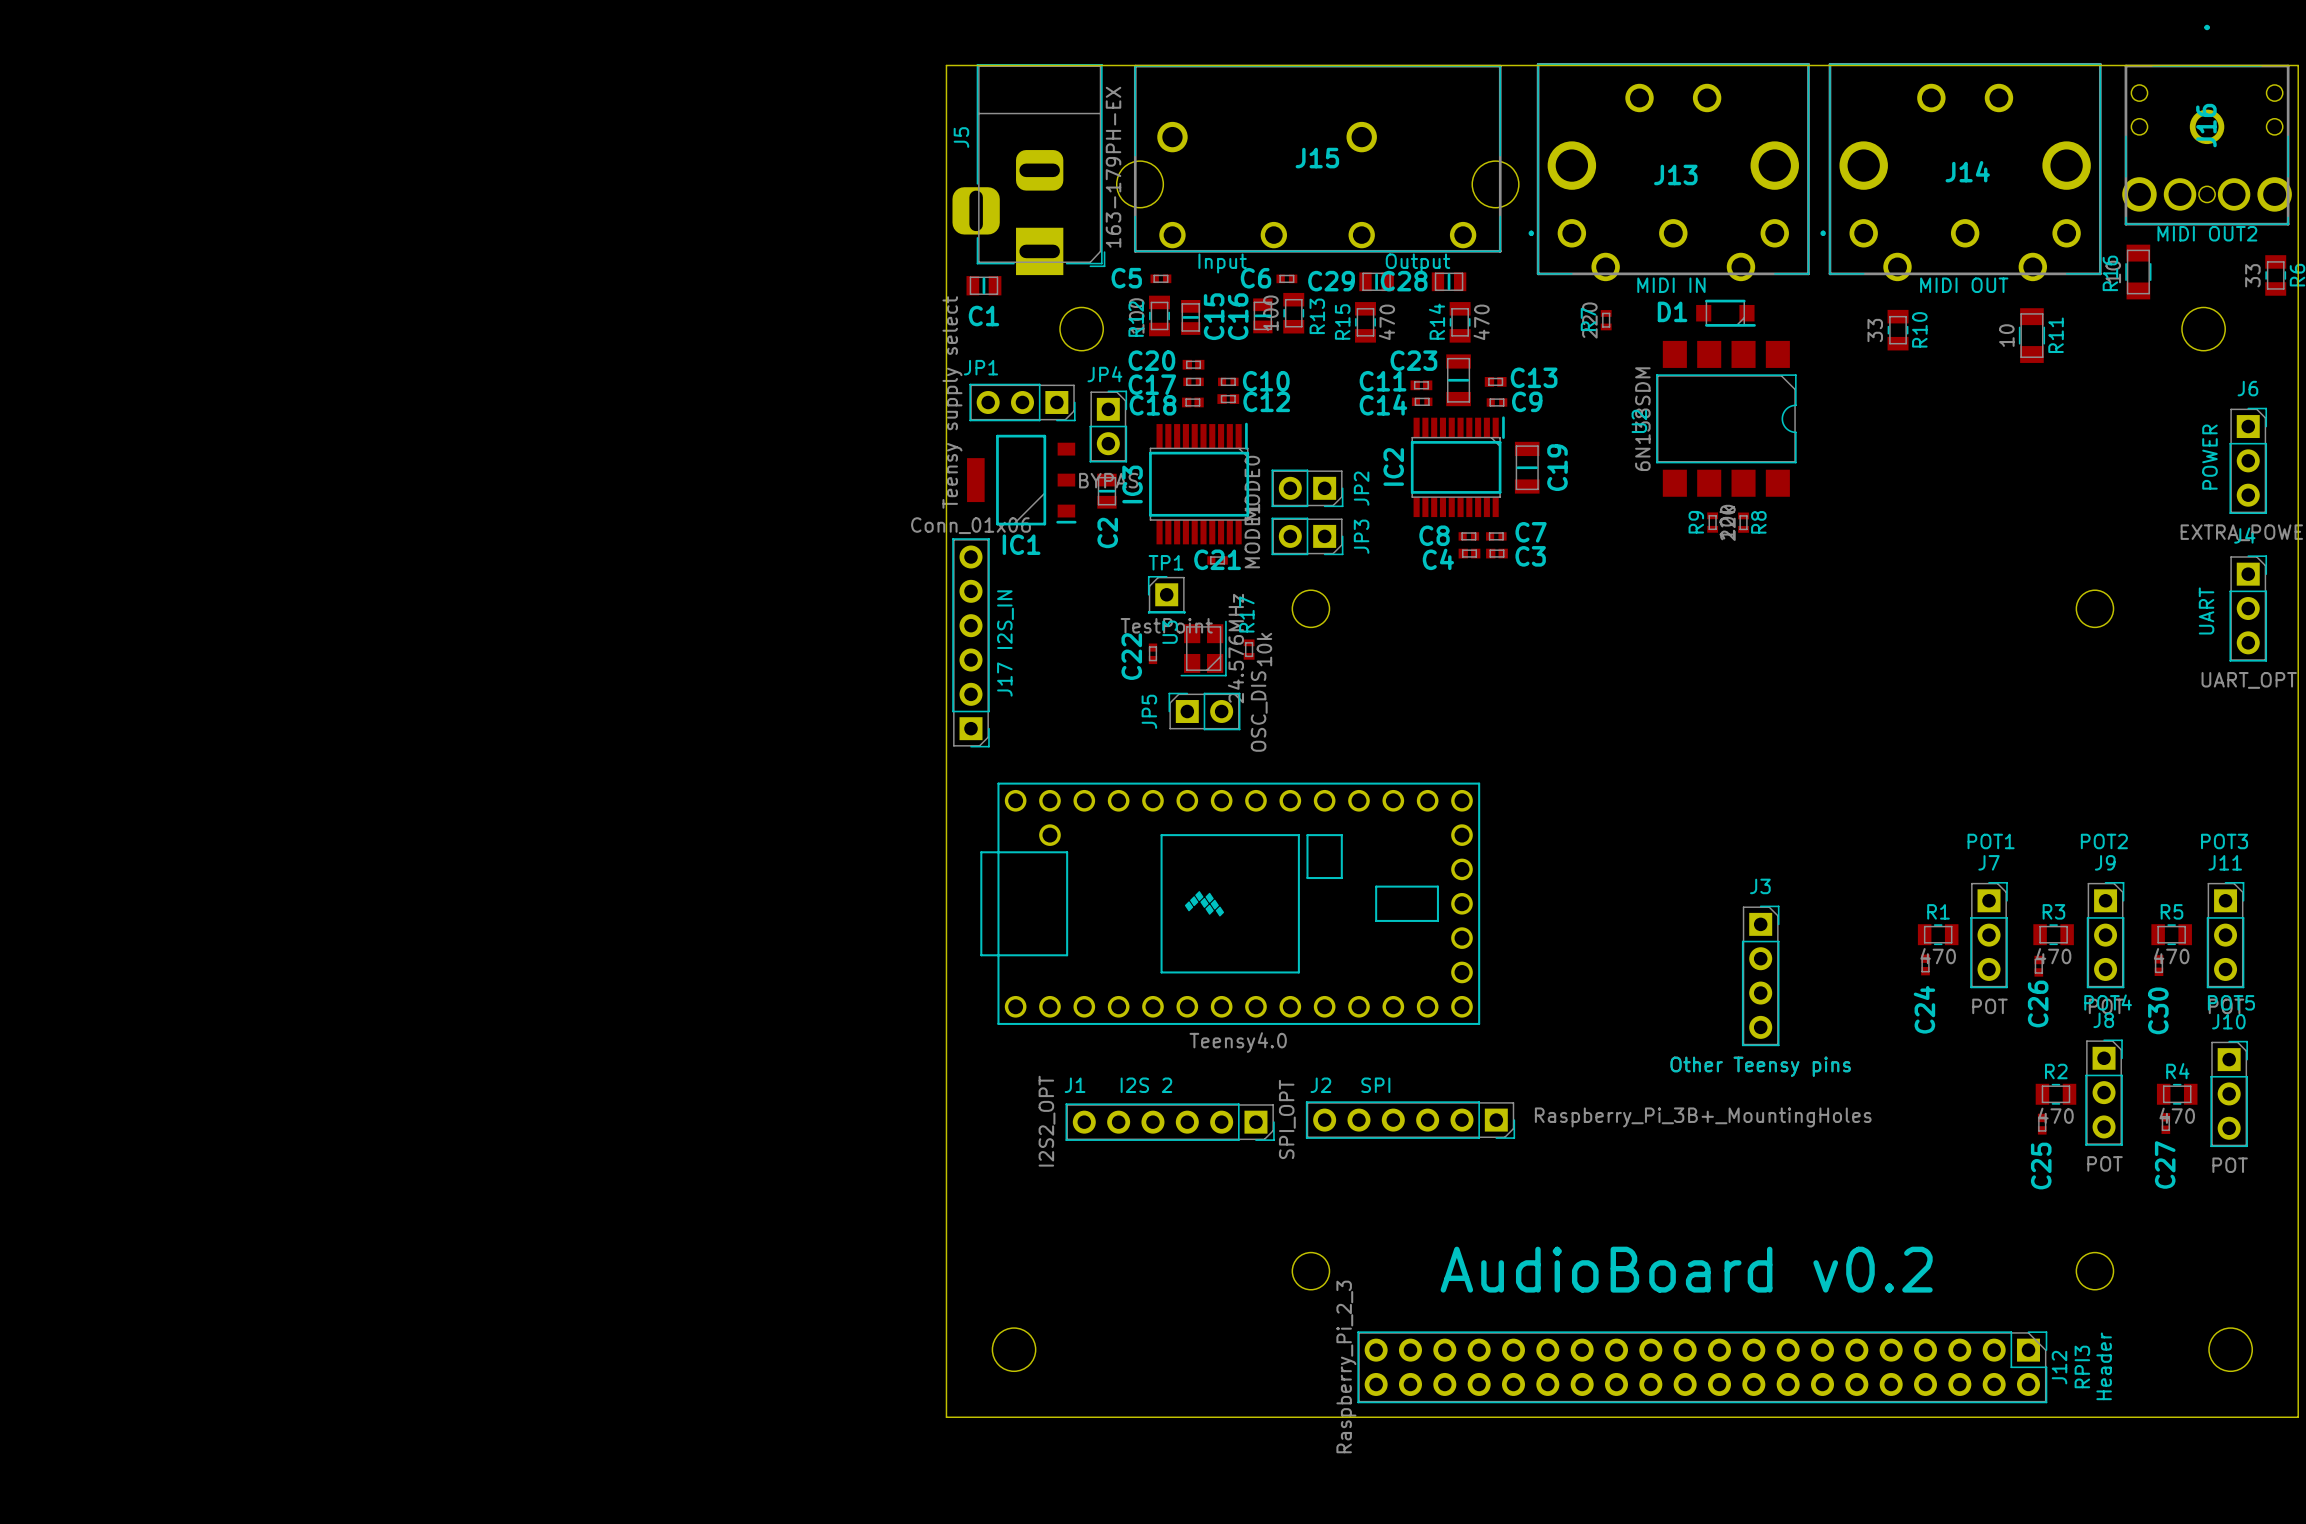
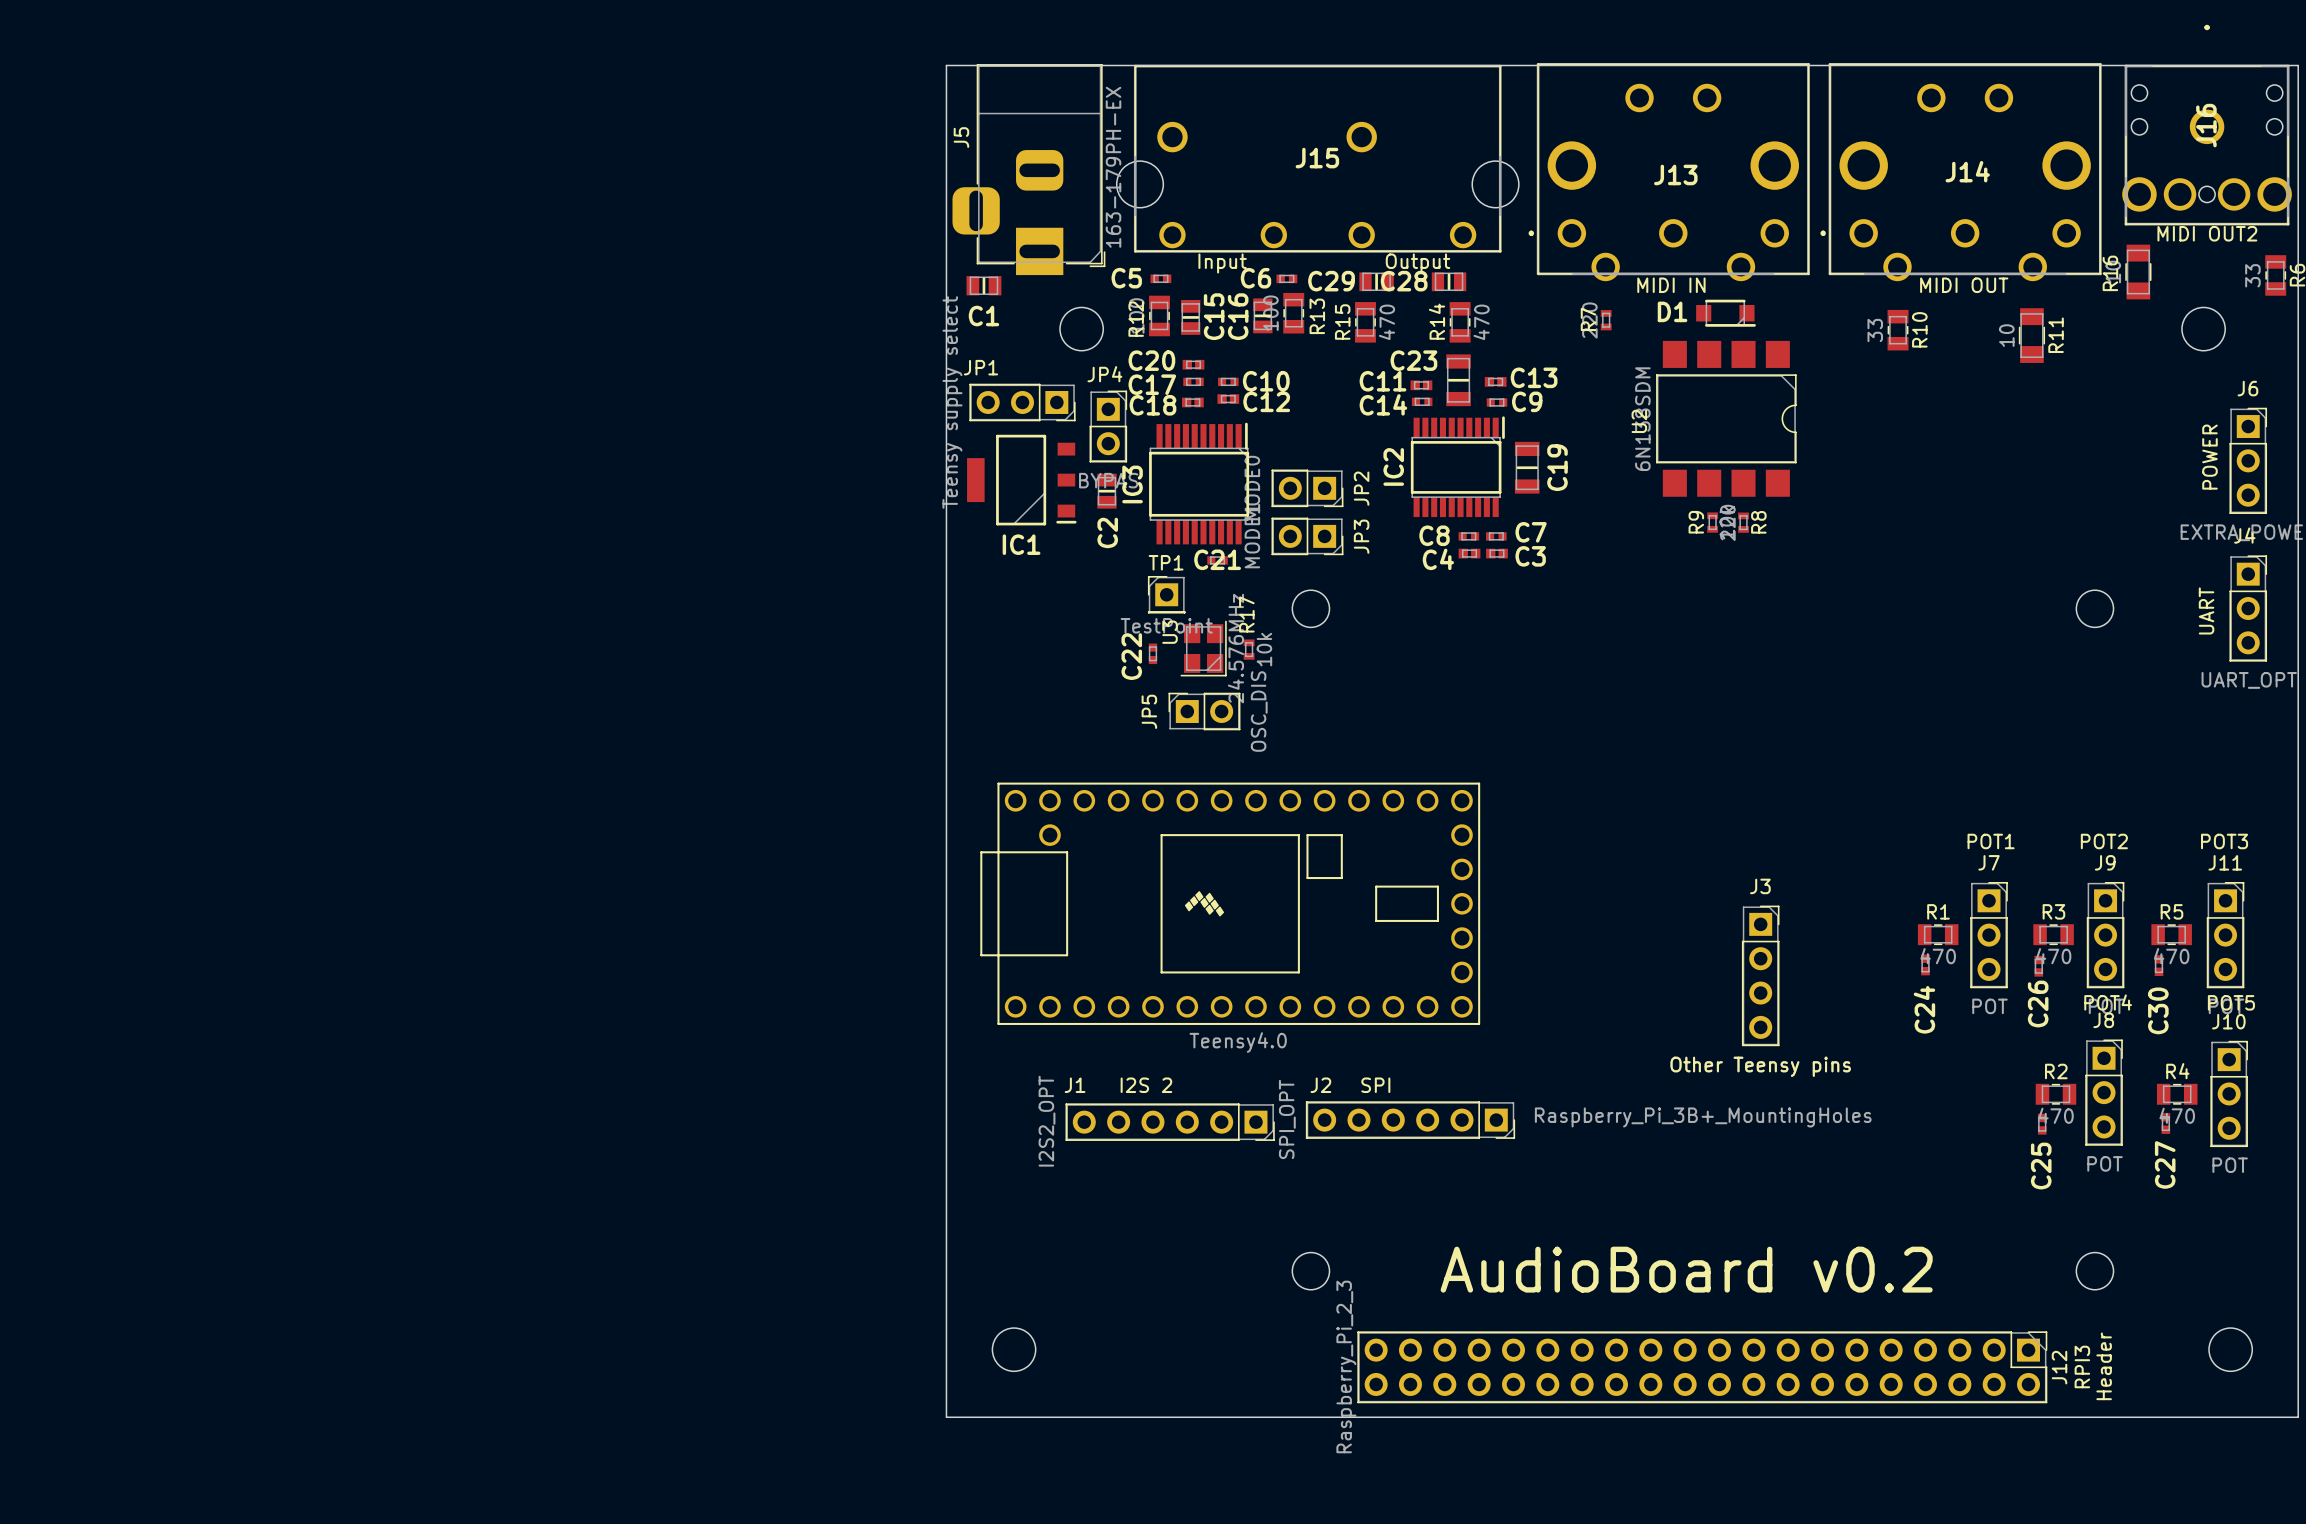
J17 I2S_IN: Conn_01x06 (971, 642) -> none

